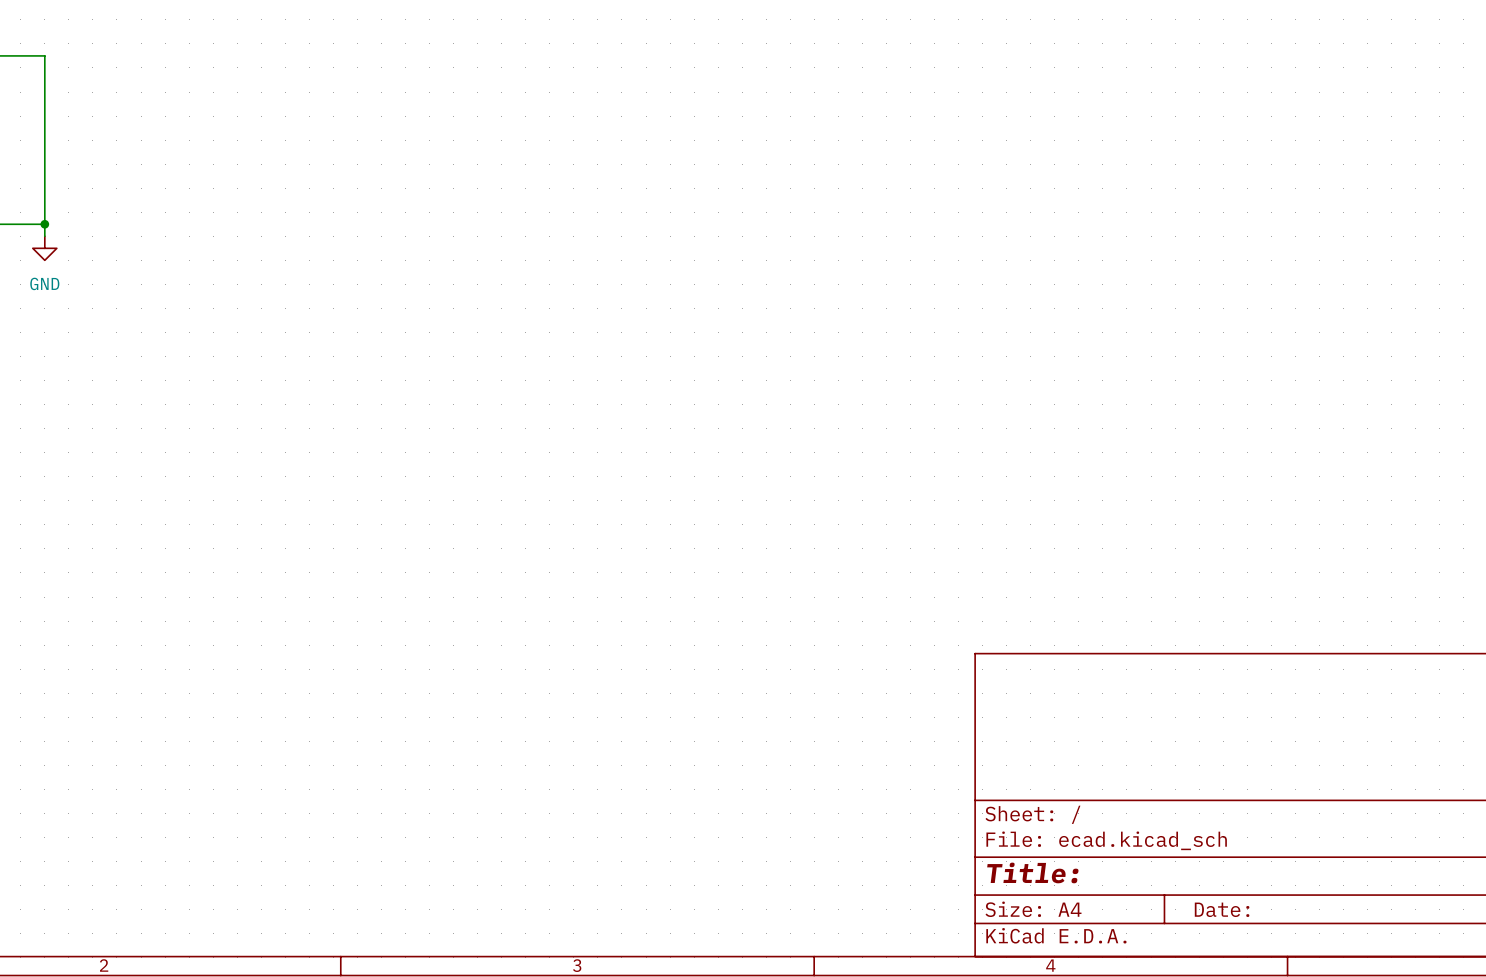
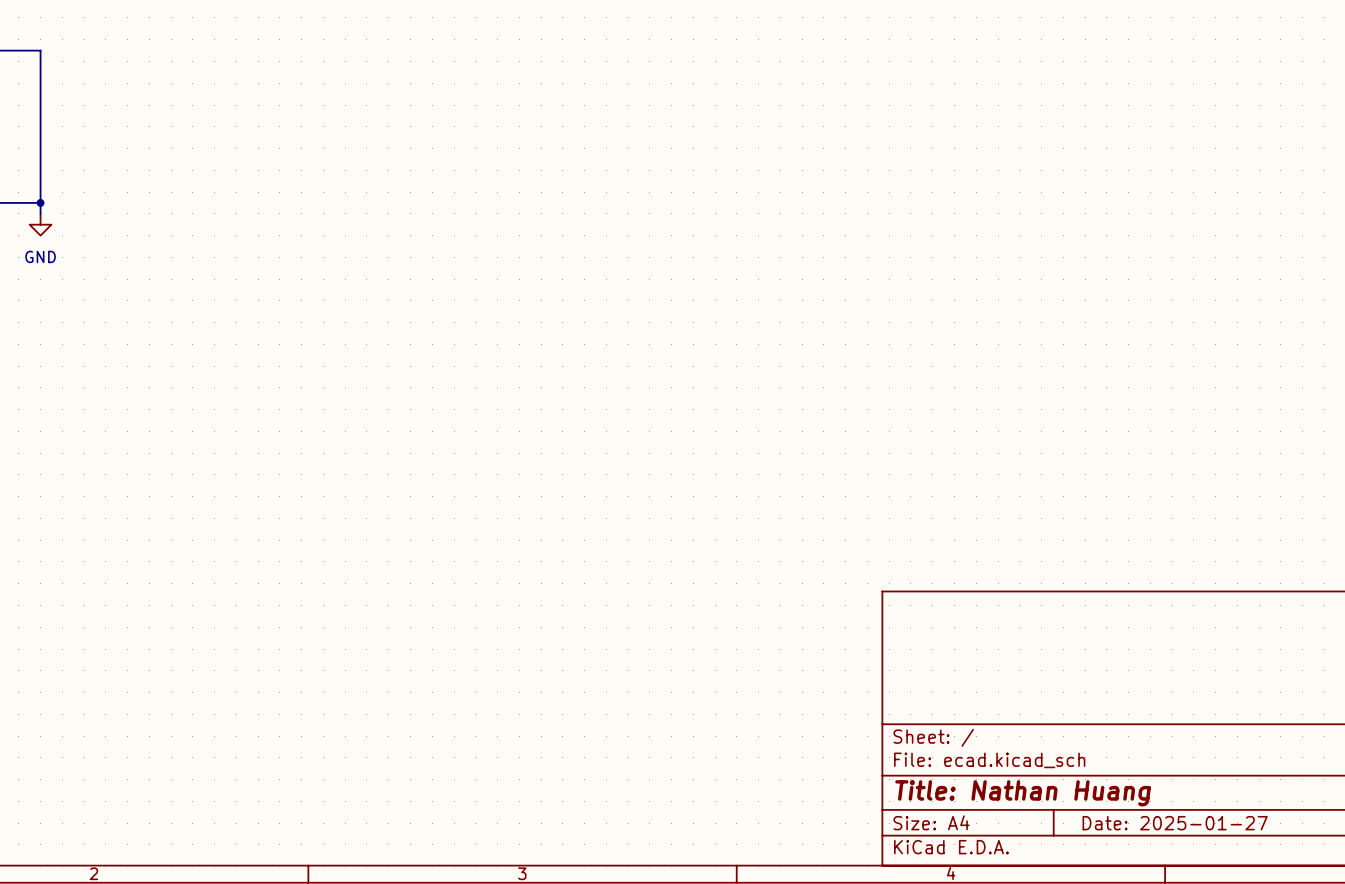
title block: Title: (1032, 872) -> Title: Nathan Huang (1023, 793)
title block: Date: (1222, 909) -> Date: 2025-01-27 (1175, 823)

